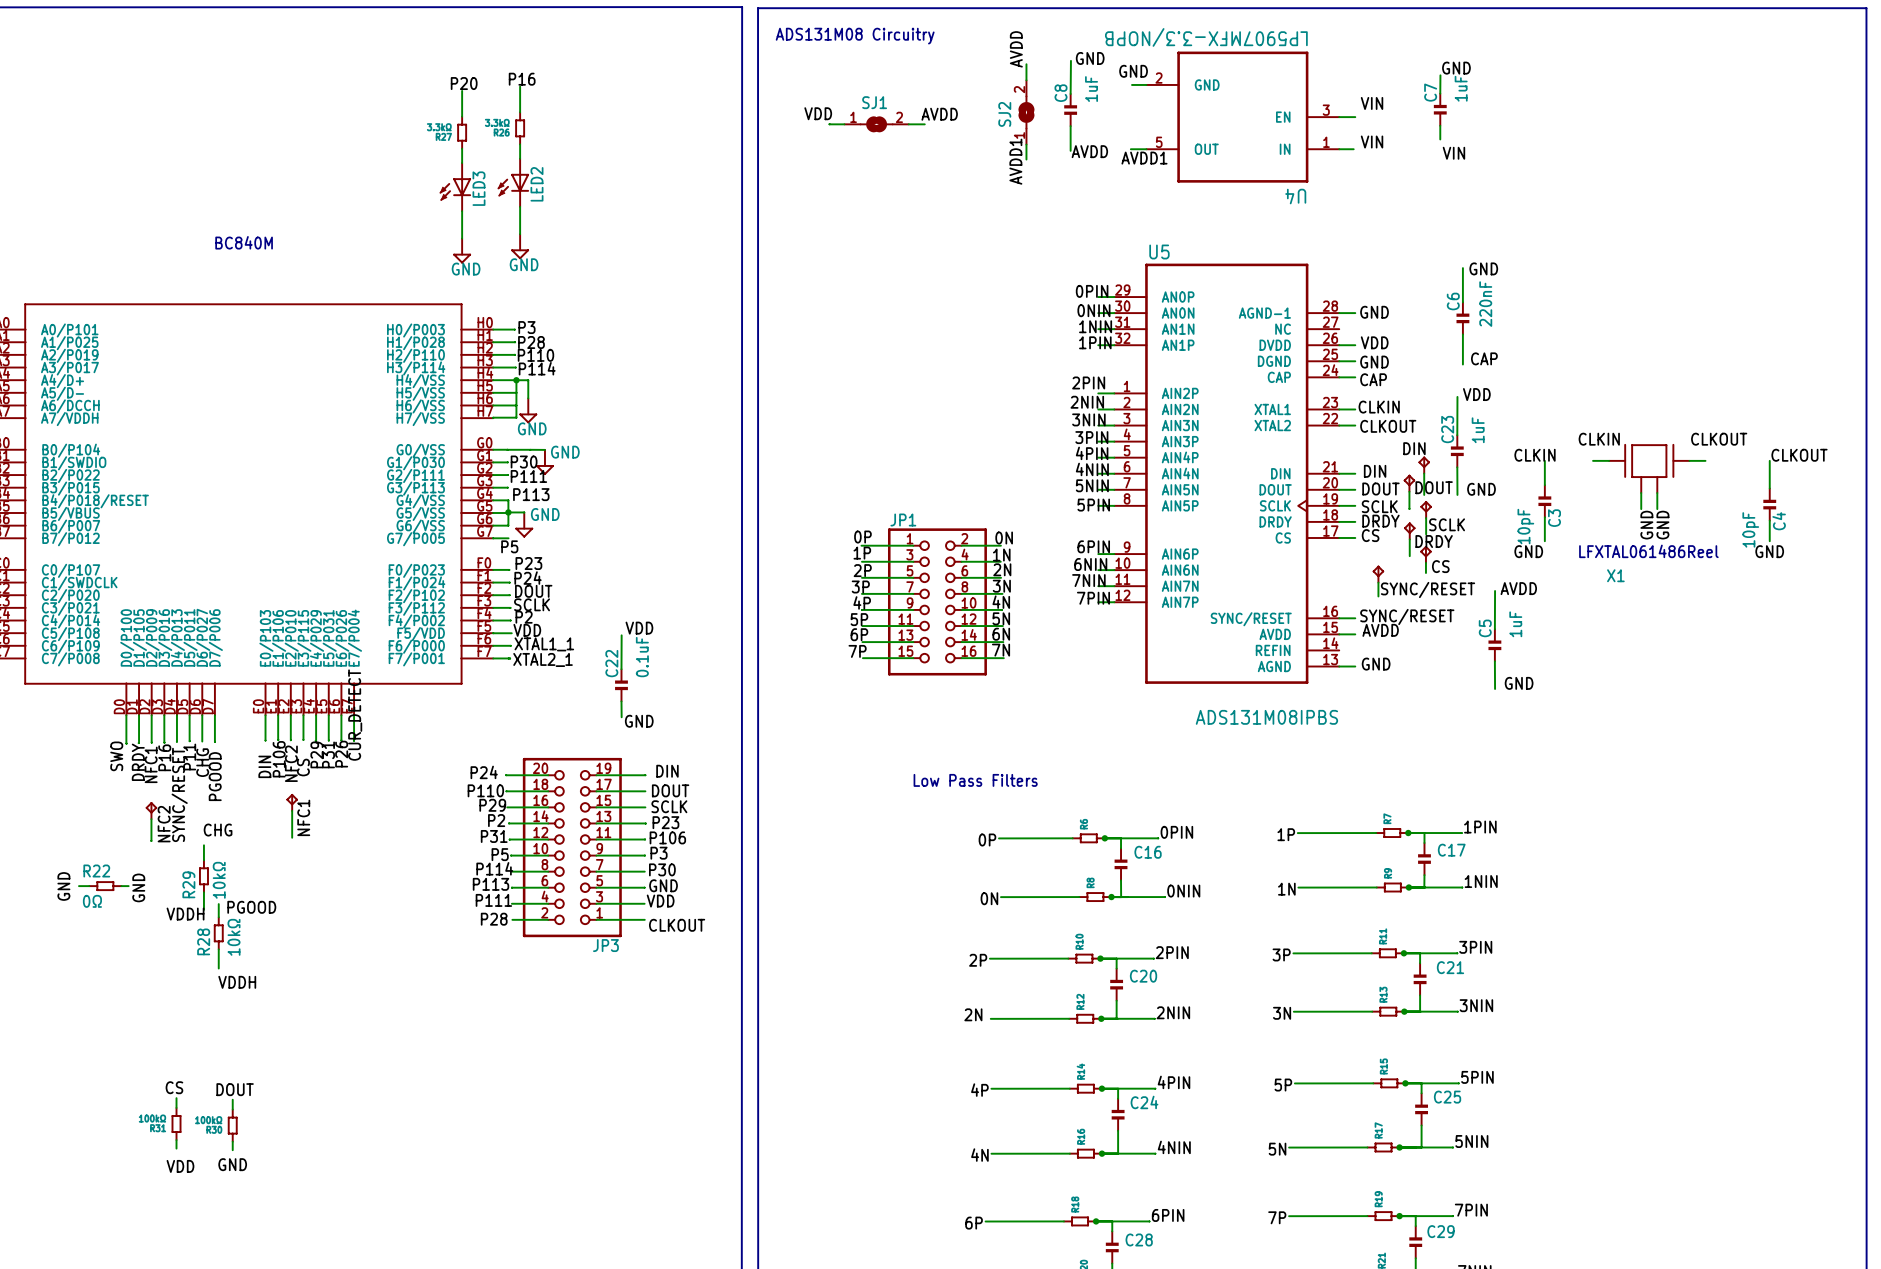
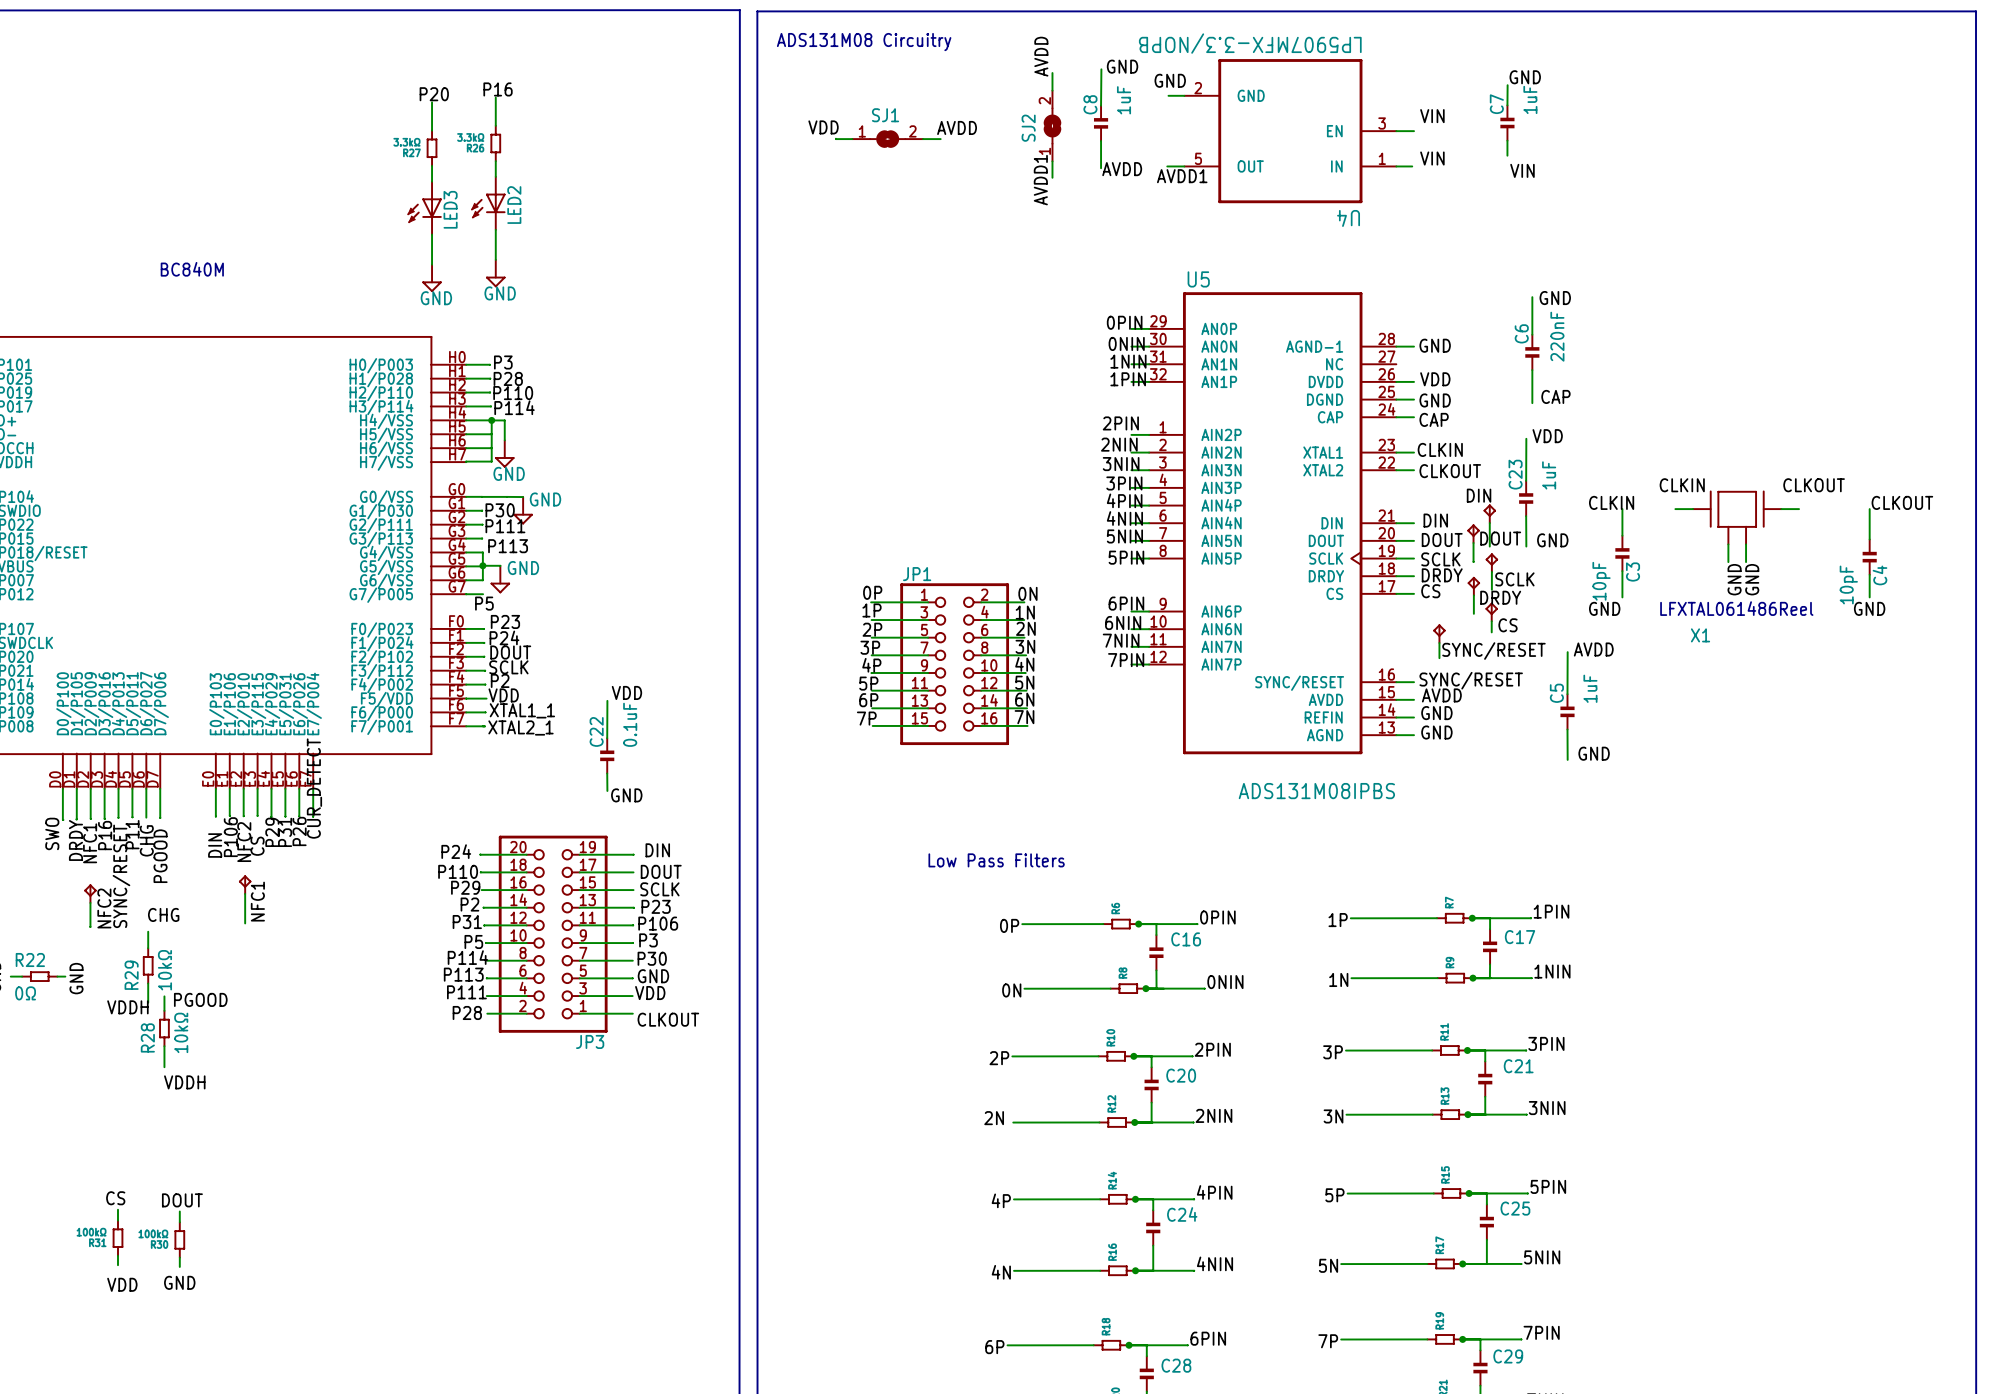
label: none -> GND (1436, 713)
wire: none -> (1396, 717) (1414, 717)

